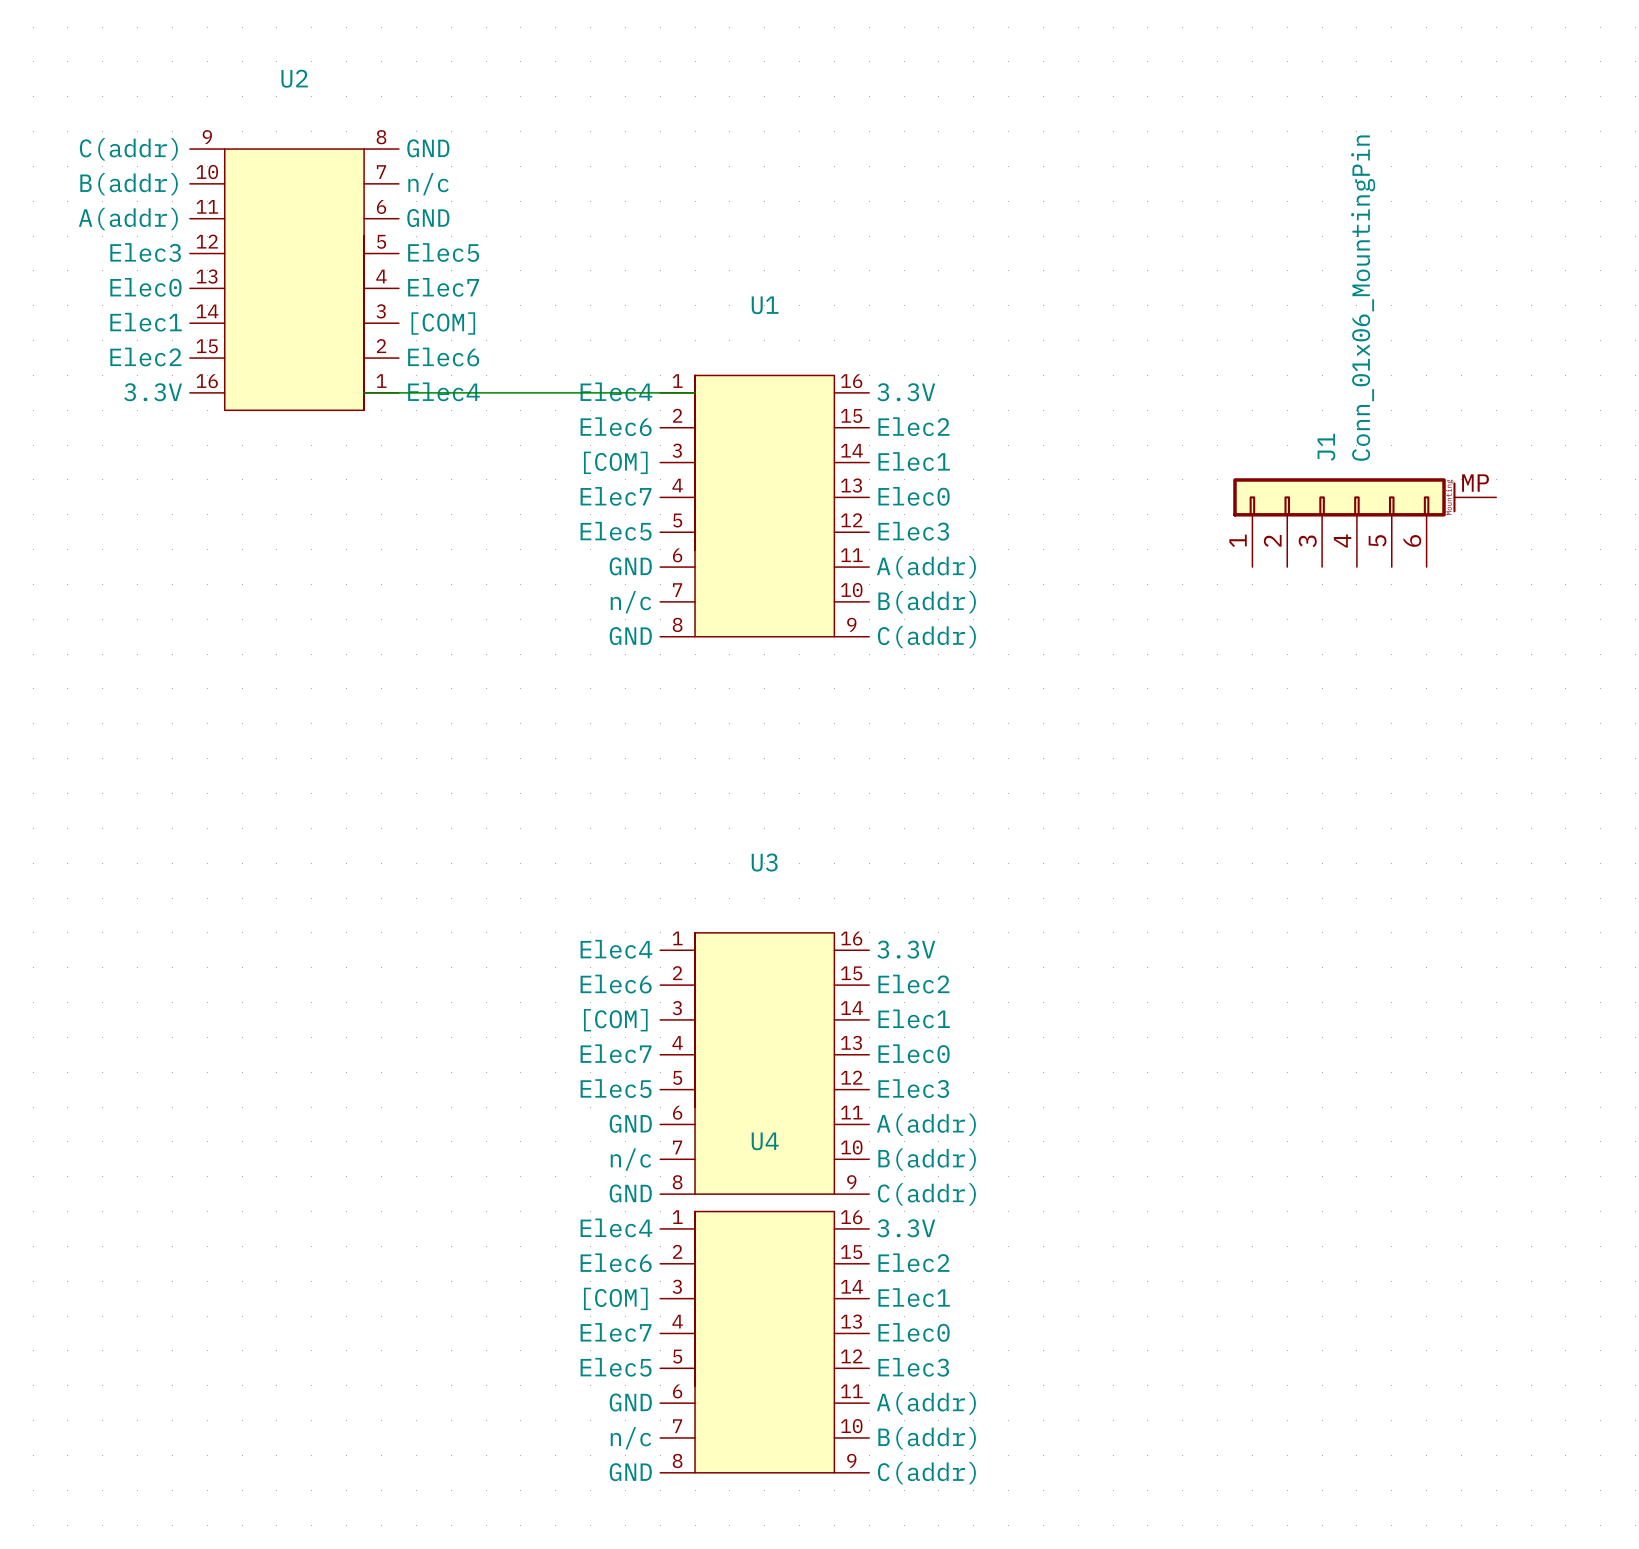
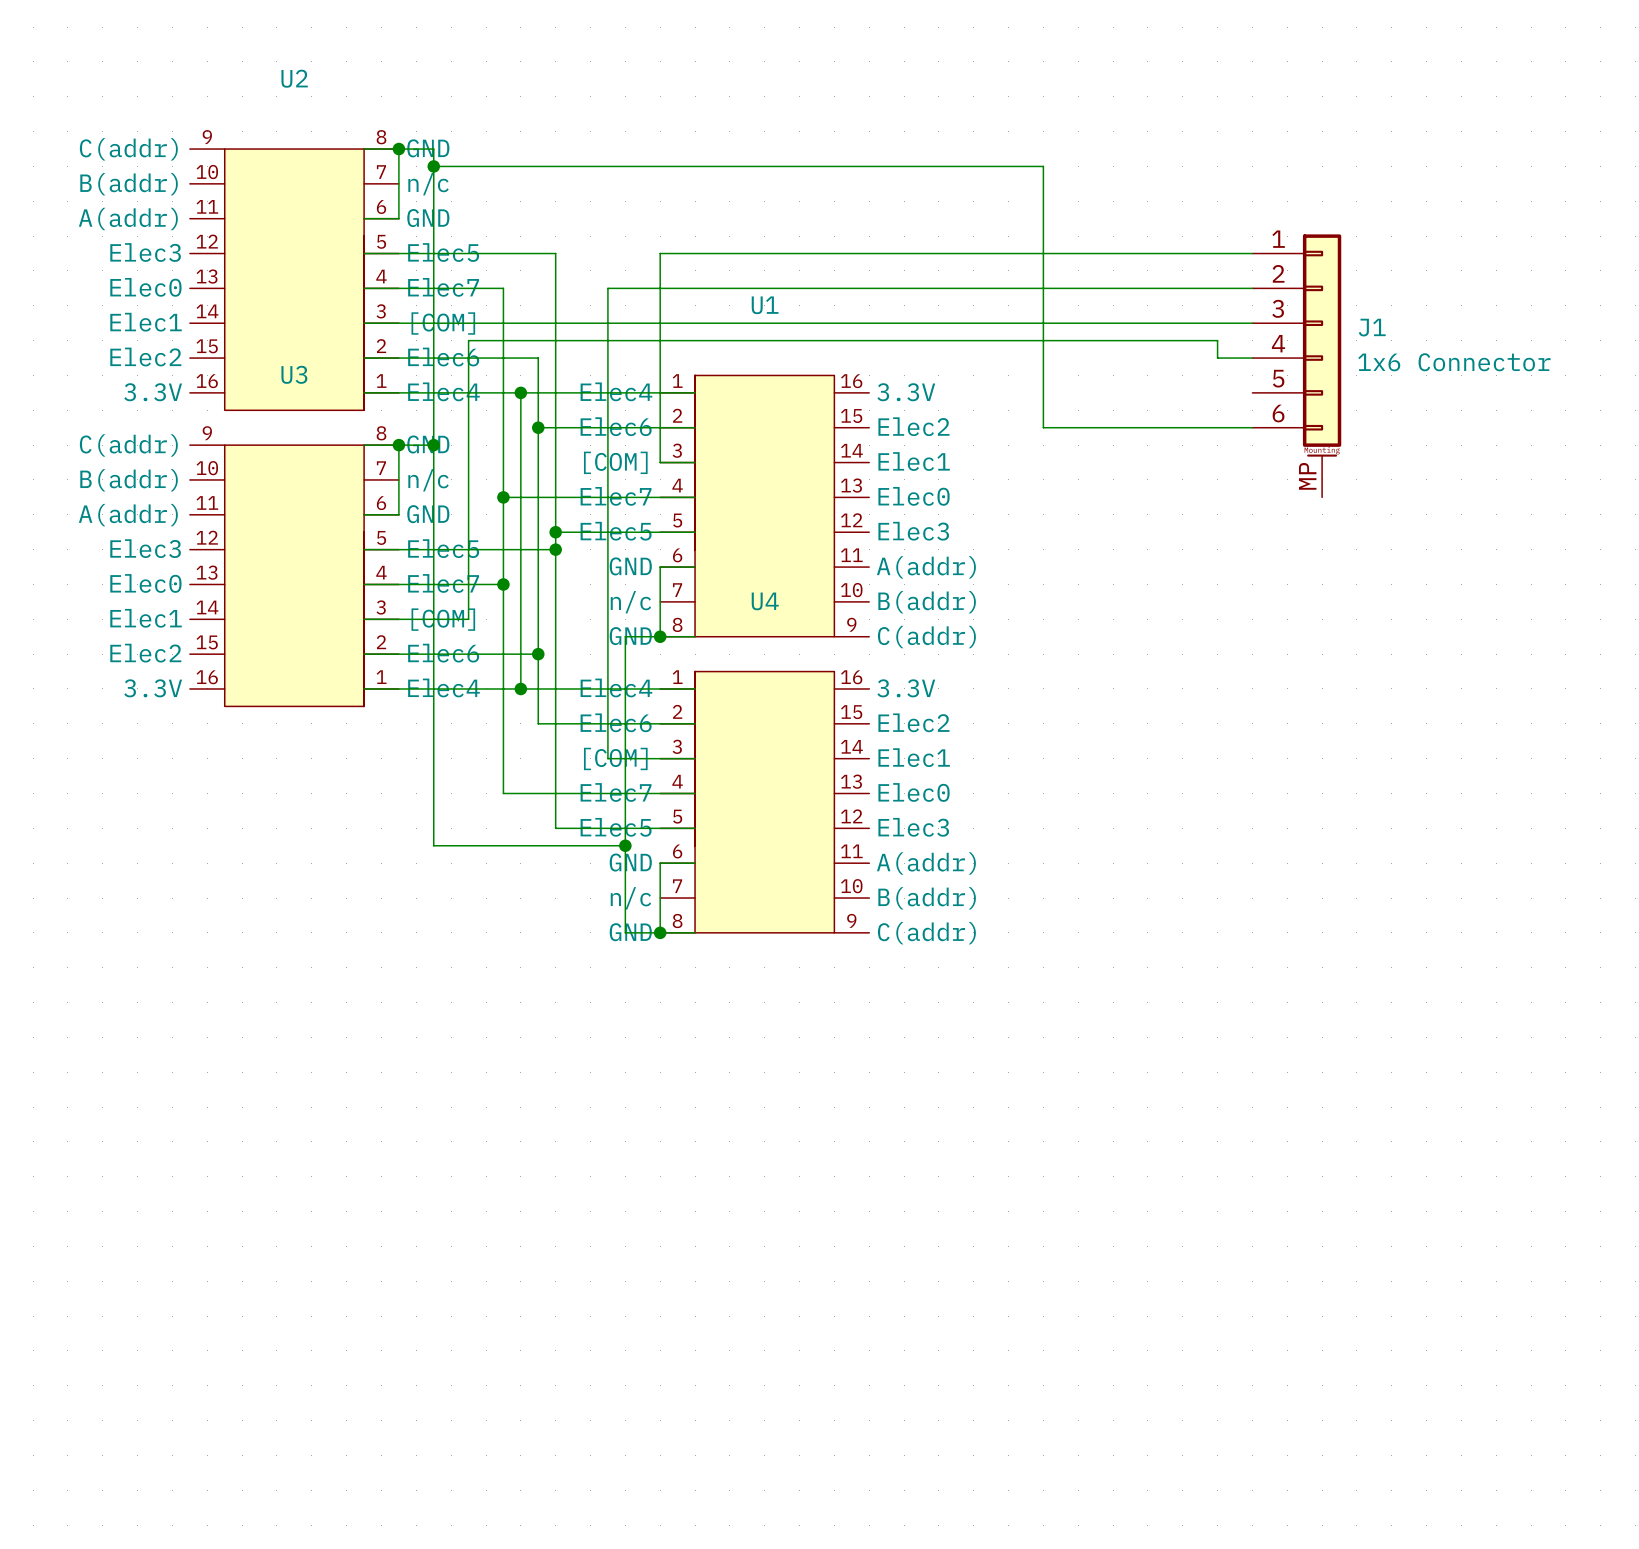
wire: none -> (364, 149) (433, 149) (433, 845) (625, 845)
wire: none -> (398, 149) (398, 218) (364, 218)
junction: none -> (398, 149)
wire: none -> (433, 166) (1043, 166) (1043, 427) (1252, 427)
junction: none -> (433, 166)
wire: none -> (364, 253) (555, 253) (555, 828) (695, 828)
wire: none -> (1252, 253) (660, 253) (660, 462) (695, 462)
wire: none -> (364, 288) (503, 288) (503, 793) (695, 793)
wire: none -> (1252, 288) (607, 288) (607, 758) (695, 758)
J1 value: Conn_01x06_MountingPin (1363, 298) -> 1x6 Connector (1454, 362)
wire: none -> (364, 323) (1252, 323)
wire: none -> (364, 358) (538, 358) (538, 723) (695, 723)
wire: none -> (1252, 358) (1217, 358) (1217, 340) (468, 340) (468, 619) (364, 619)
wire: none -> (520, 392) (520, 688)
junction: none -> (520, 392)
wire: none -> (538, 427) (695, 427)
junction: none -> (538, 427)
wire: none -> (364, 445) (433, 445)
wire: none -> (398, 445) (398, 514) (364, 514)
junction: none -> (398, 445)
junction: none -> (433, 445)
wire: none -> (503, 497) (695, 497)
junction: none -> (503, 497)
J1 rotation: 0° (1344, 497) -> 90° clockwise (1322, 345)
J1 position: (1364, 522) -> (1296, 365)
wire: none -> (555, 532) (695, 532)
junction: none -> (555, 532)
wire: none -> (364, 549) (555, 549)
junction: none -> (555, 549)
wire: none -> (695, 567) (660, 567) (660, 636)
wire: none -> (364, 584) (503, 584)
junction: none -> (503, 584)
junction: none -> (660, 636)
wire: none -> (695, 636) (625, 636) (625, 932) (695, 932)
wire: none -> (364, 654) (538, 654)
junction: none -> (538, 654)
wire: none -> (364, 688) (695, 688)
junction: none -> (520, 688)
junction: none -> (625, 845)
wire: none -> (695, 863) (660, 863) (660, 932)
junction: none -> (660, 932)
U3 rotation: 0° (764, 1063) -> 180° (294, 575)
U3 position: (764, 1063) -> (294, 575)
U4 position: (764, 1342) -> (764, 802)

